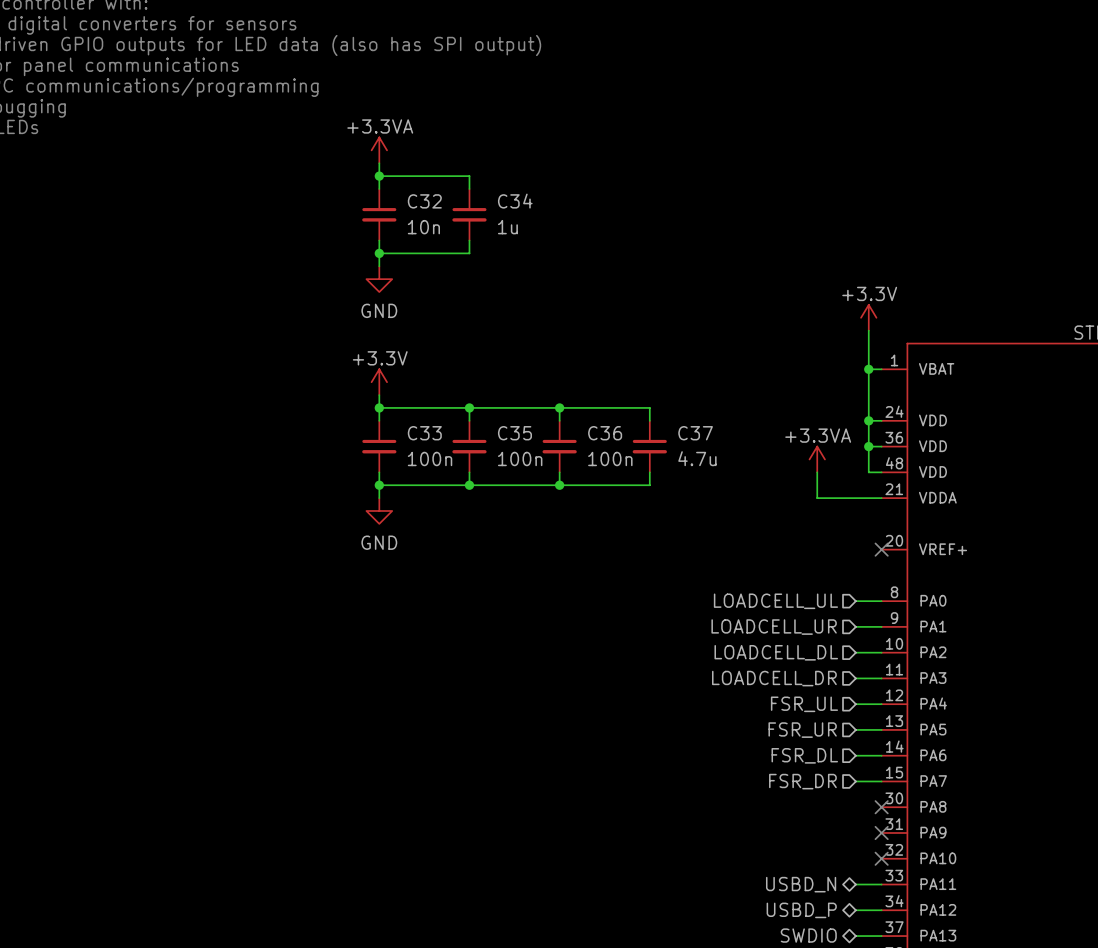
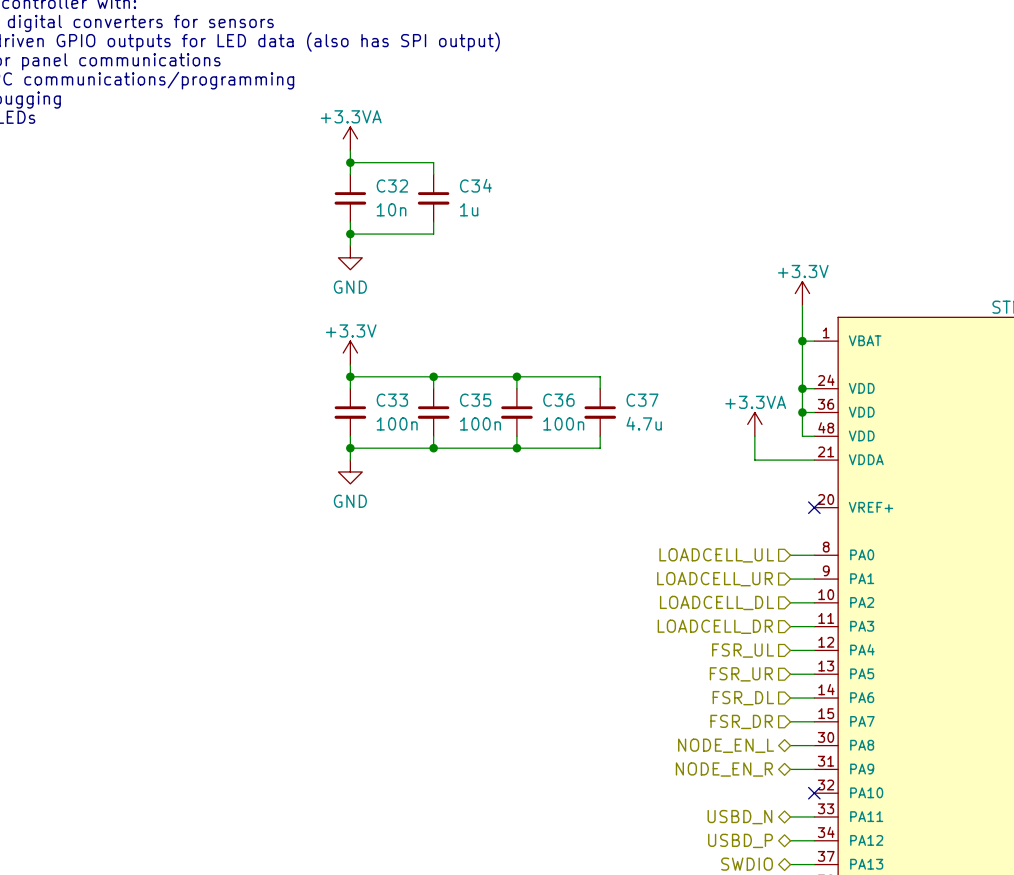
hierarchical label: none -> NODE_EN_L (726, 745)
wire: none -> (790, 745) (814, 745)
no-connect mark: (881, 807) -> none
wire: none -> (790, 769) (814, 769)
no-connect mark: (881, 832) -> none
hierarchical label: none -> NODE_EN_R (724, 769)

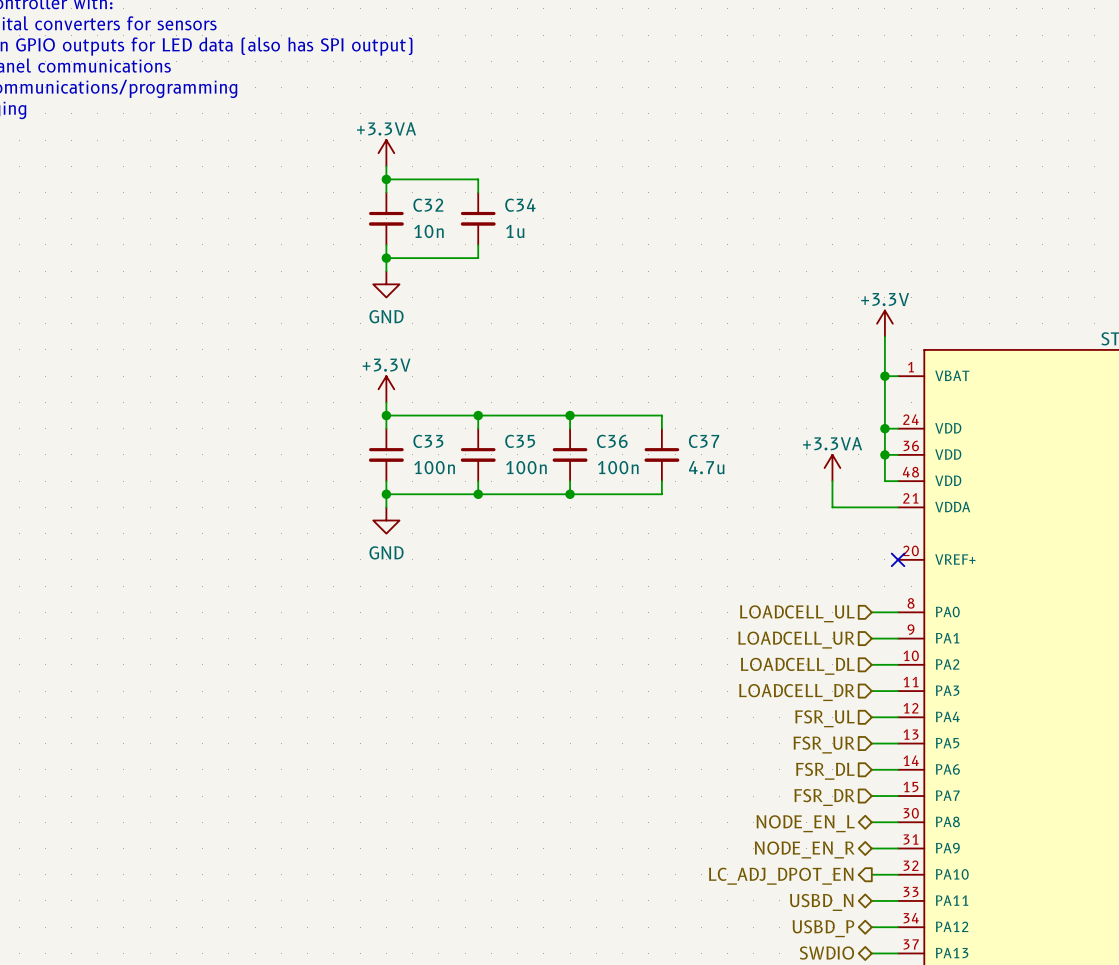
hierarchical label: none -> LC_ADJ_DPOT_EN (781, 876)
wire: none -> (871, 874) (898, 874)
no-connect mark: (814, 793) -> none

